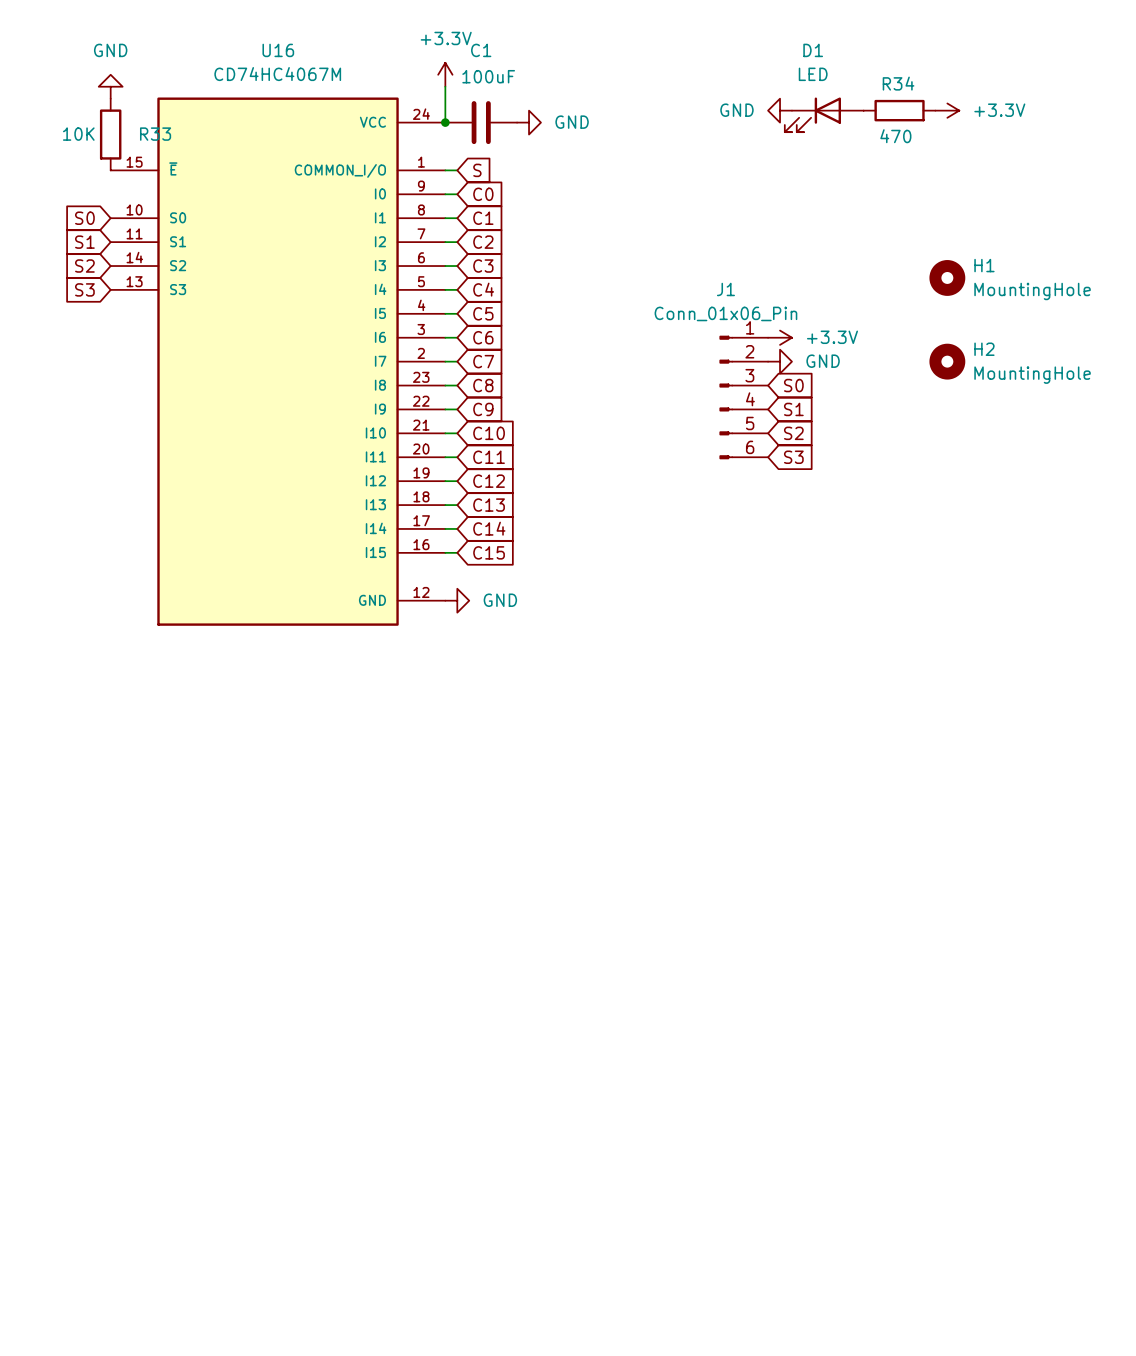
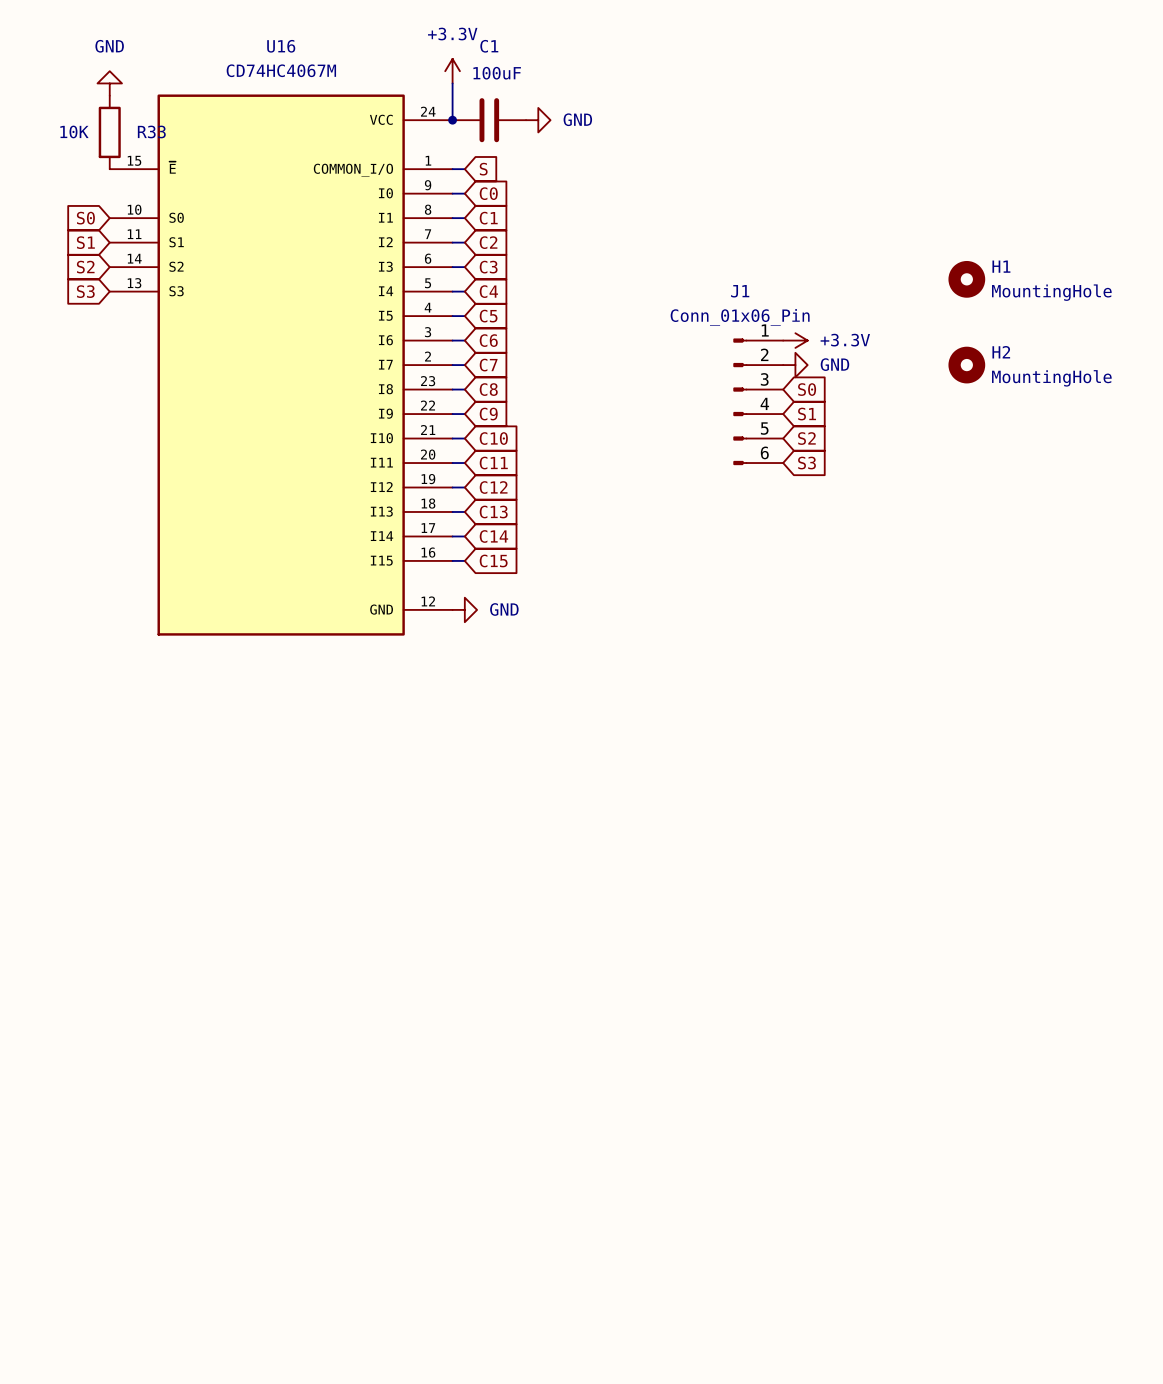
power symbol: GND (780, 110) -> none
R34: 470 (899, 110) -> none
power symbol: +3.3V (947, 110) -> none
D1: LED (824, 114) -> none

